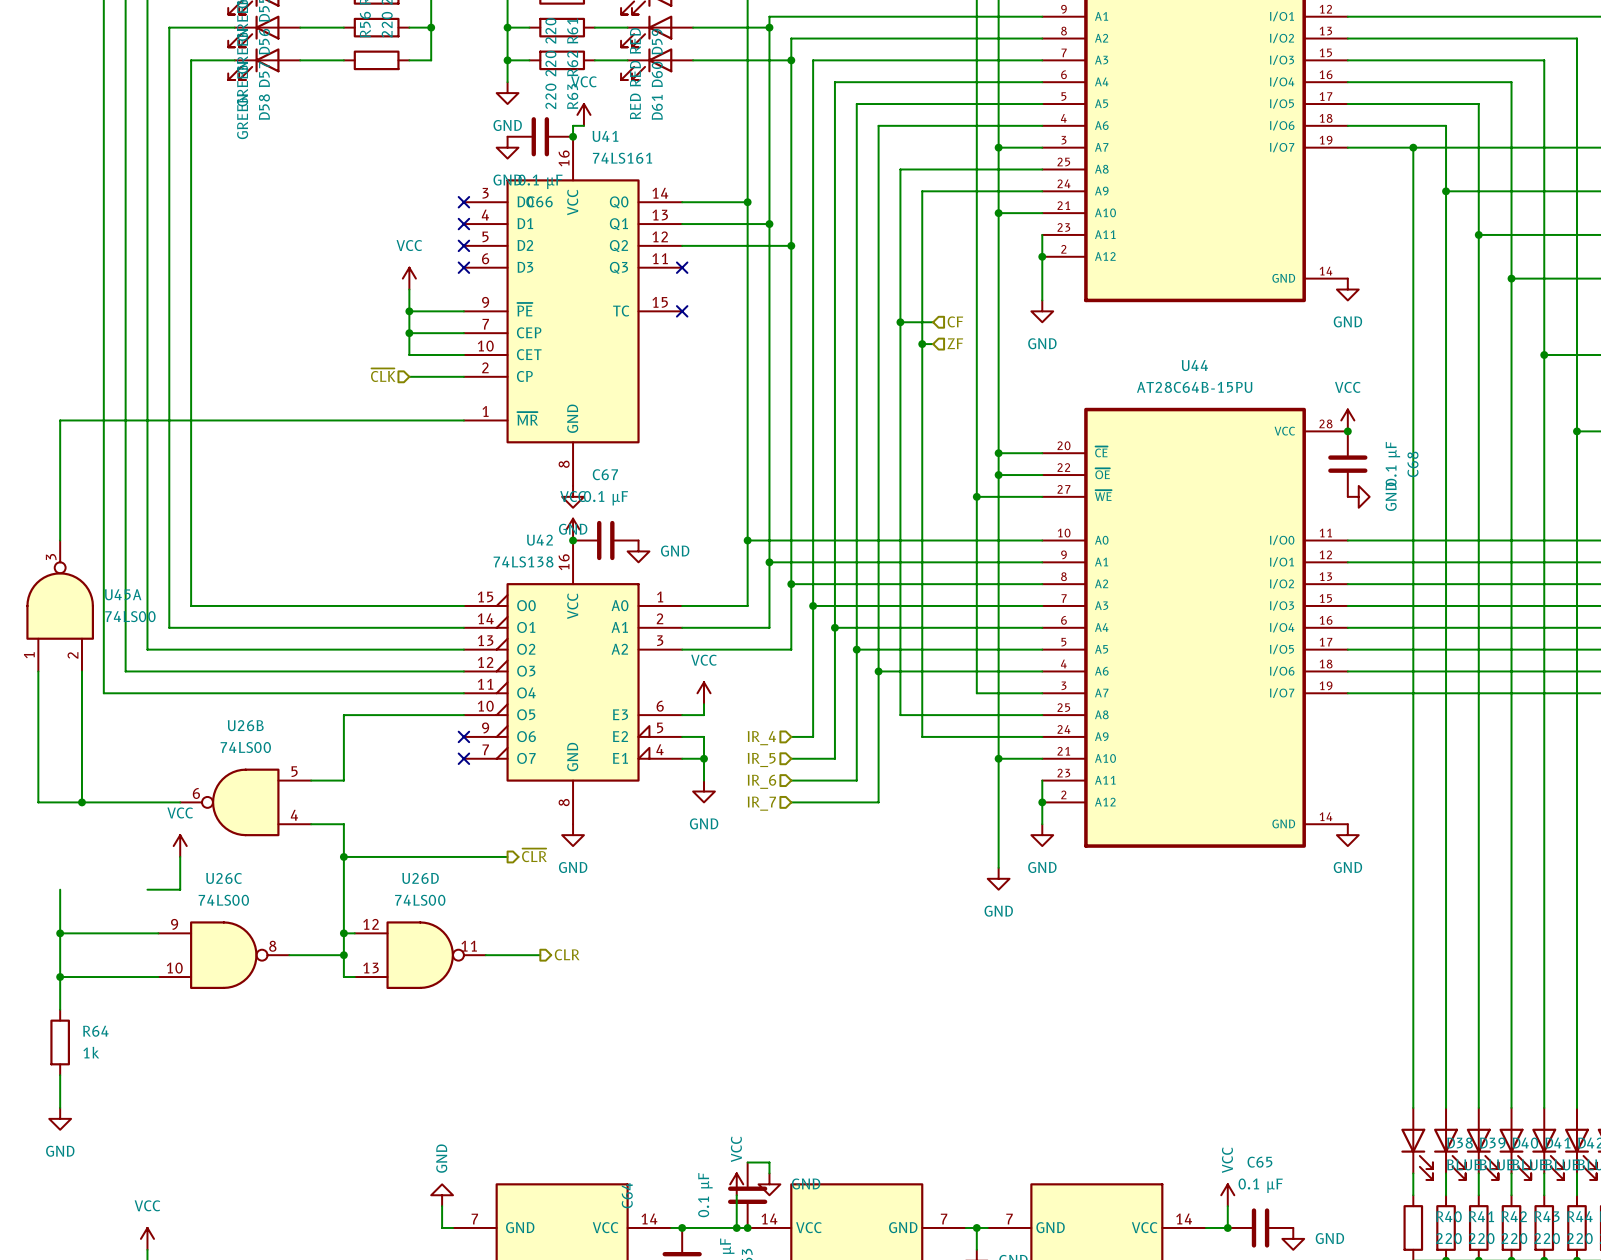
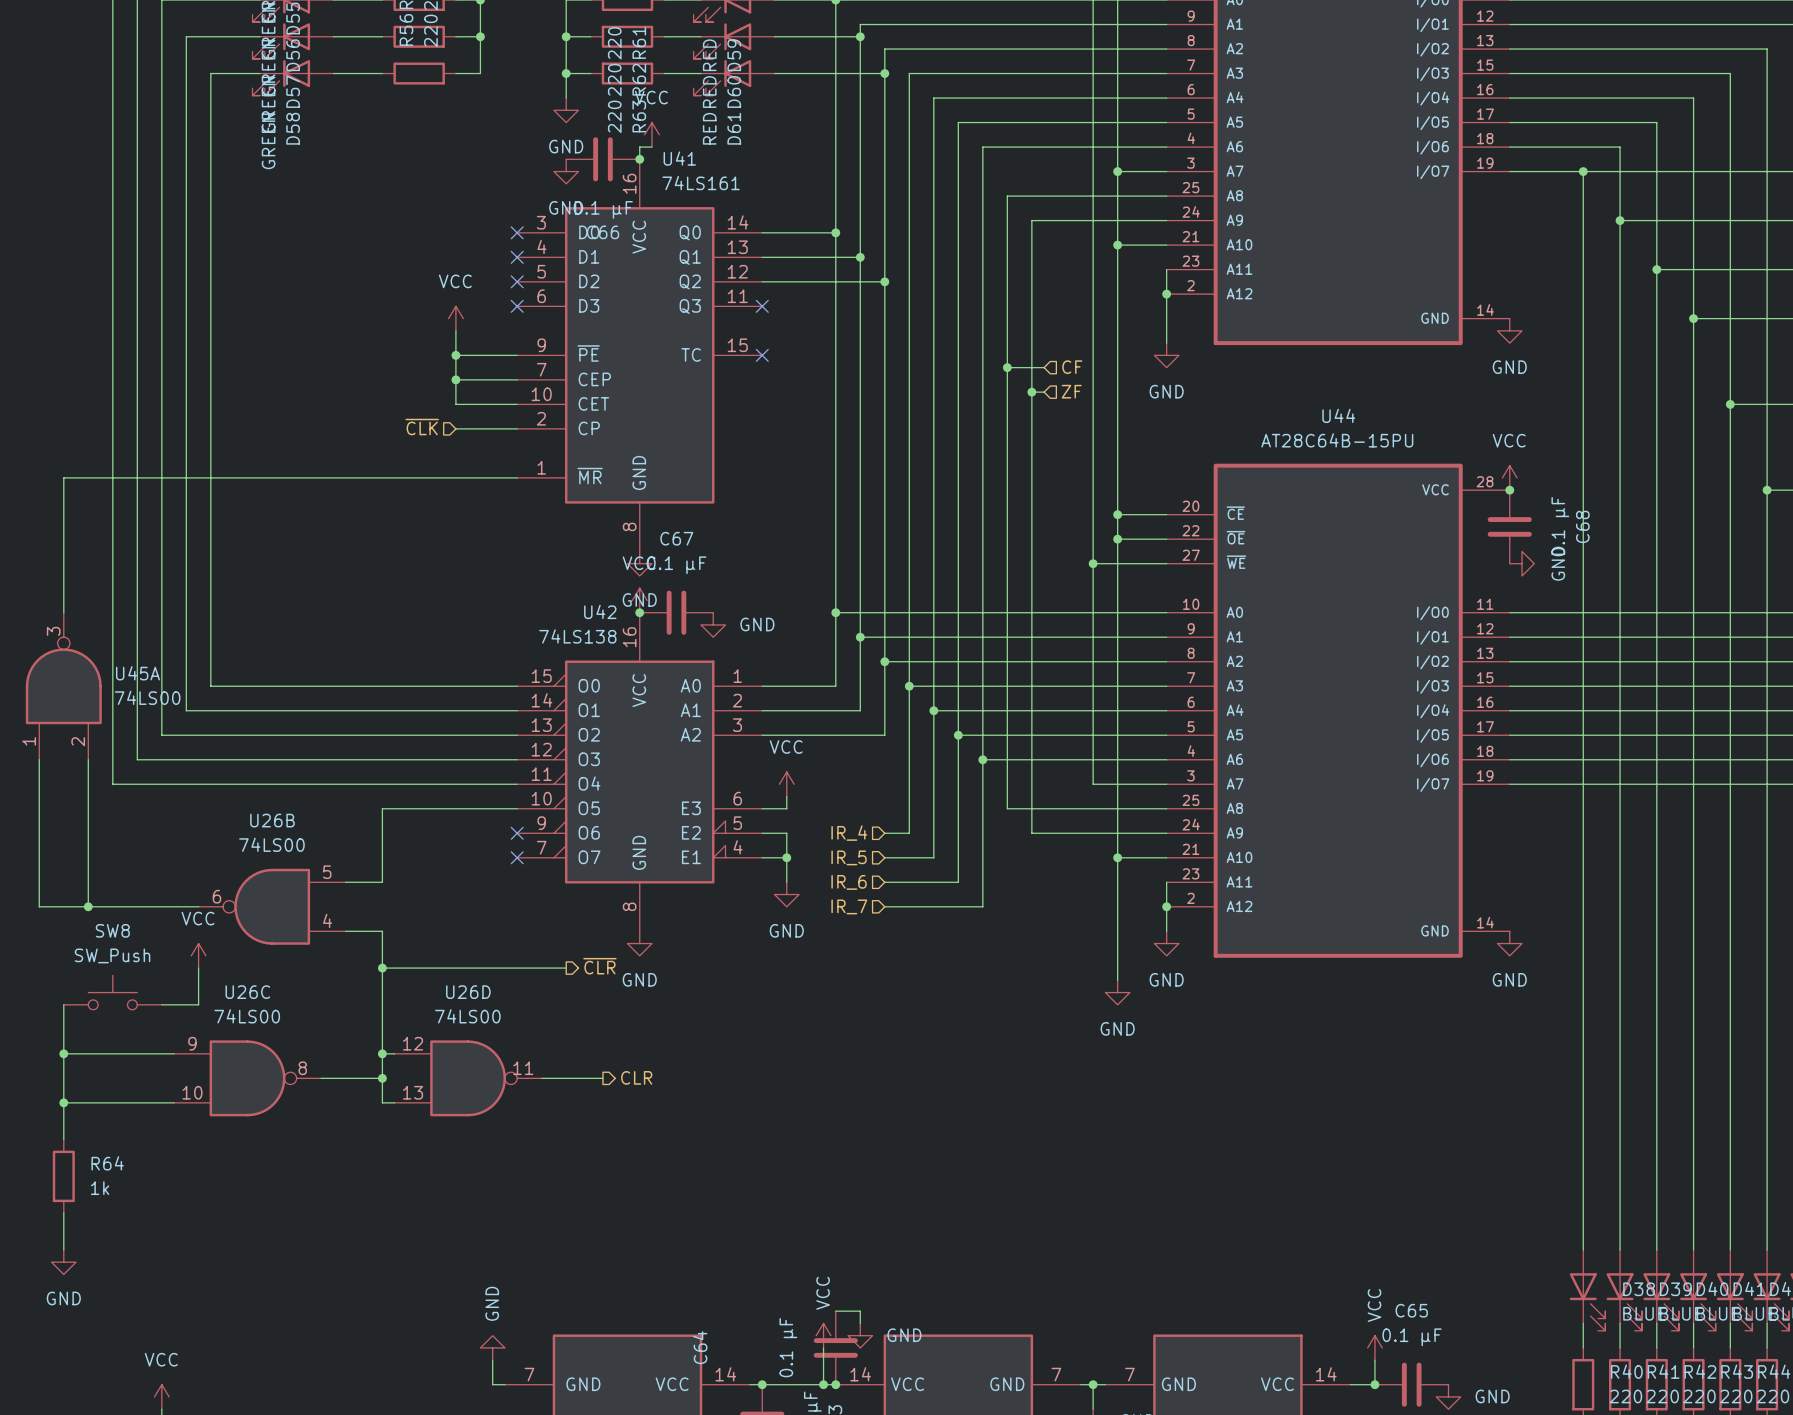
SW8: none -> SW_Push (112, 992)

